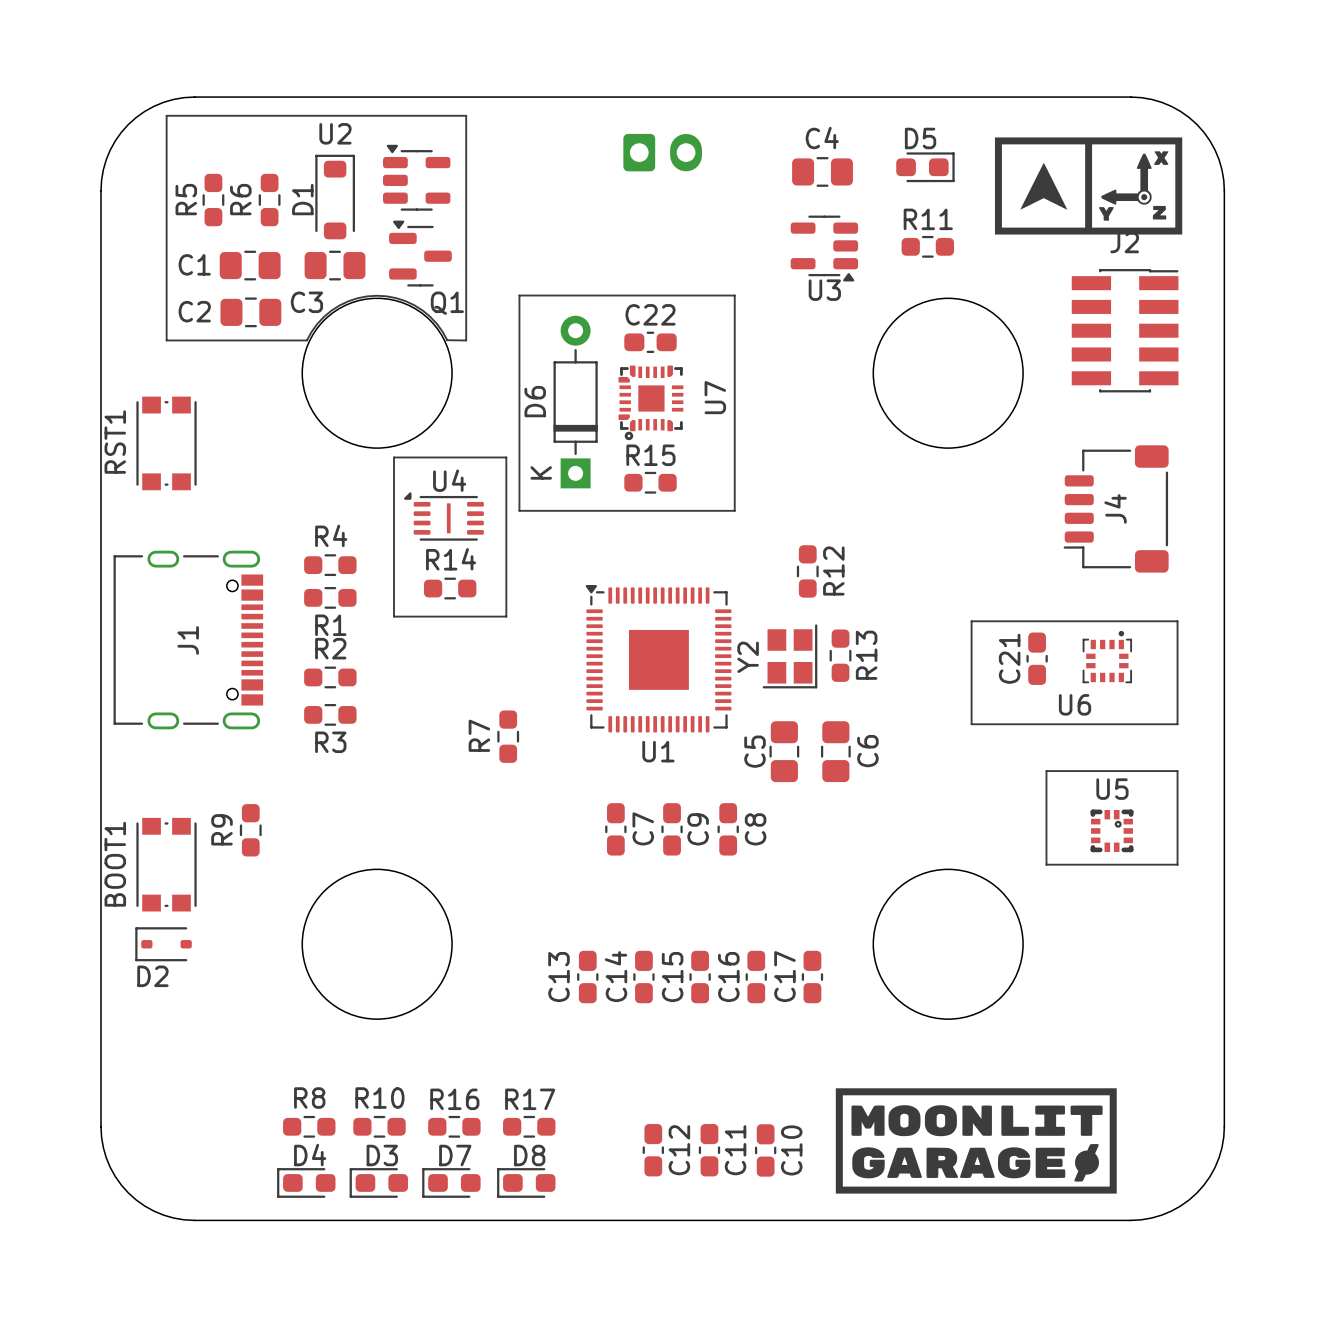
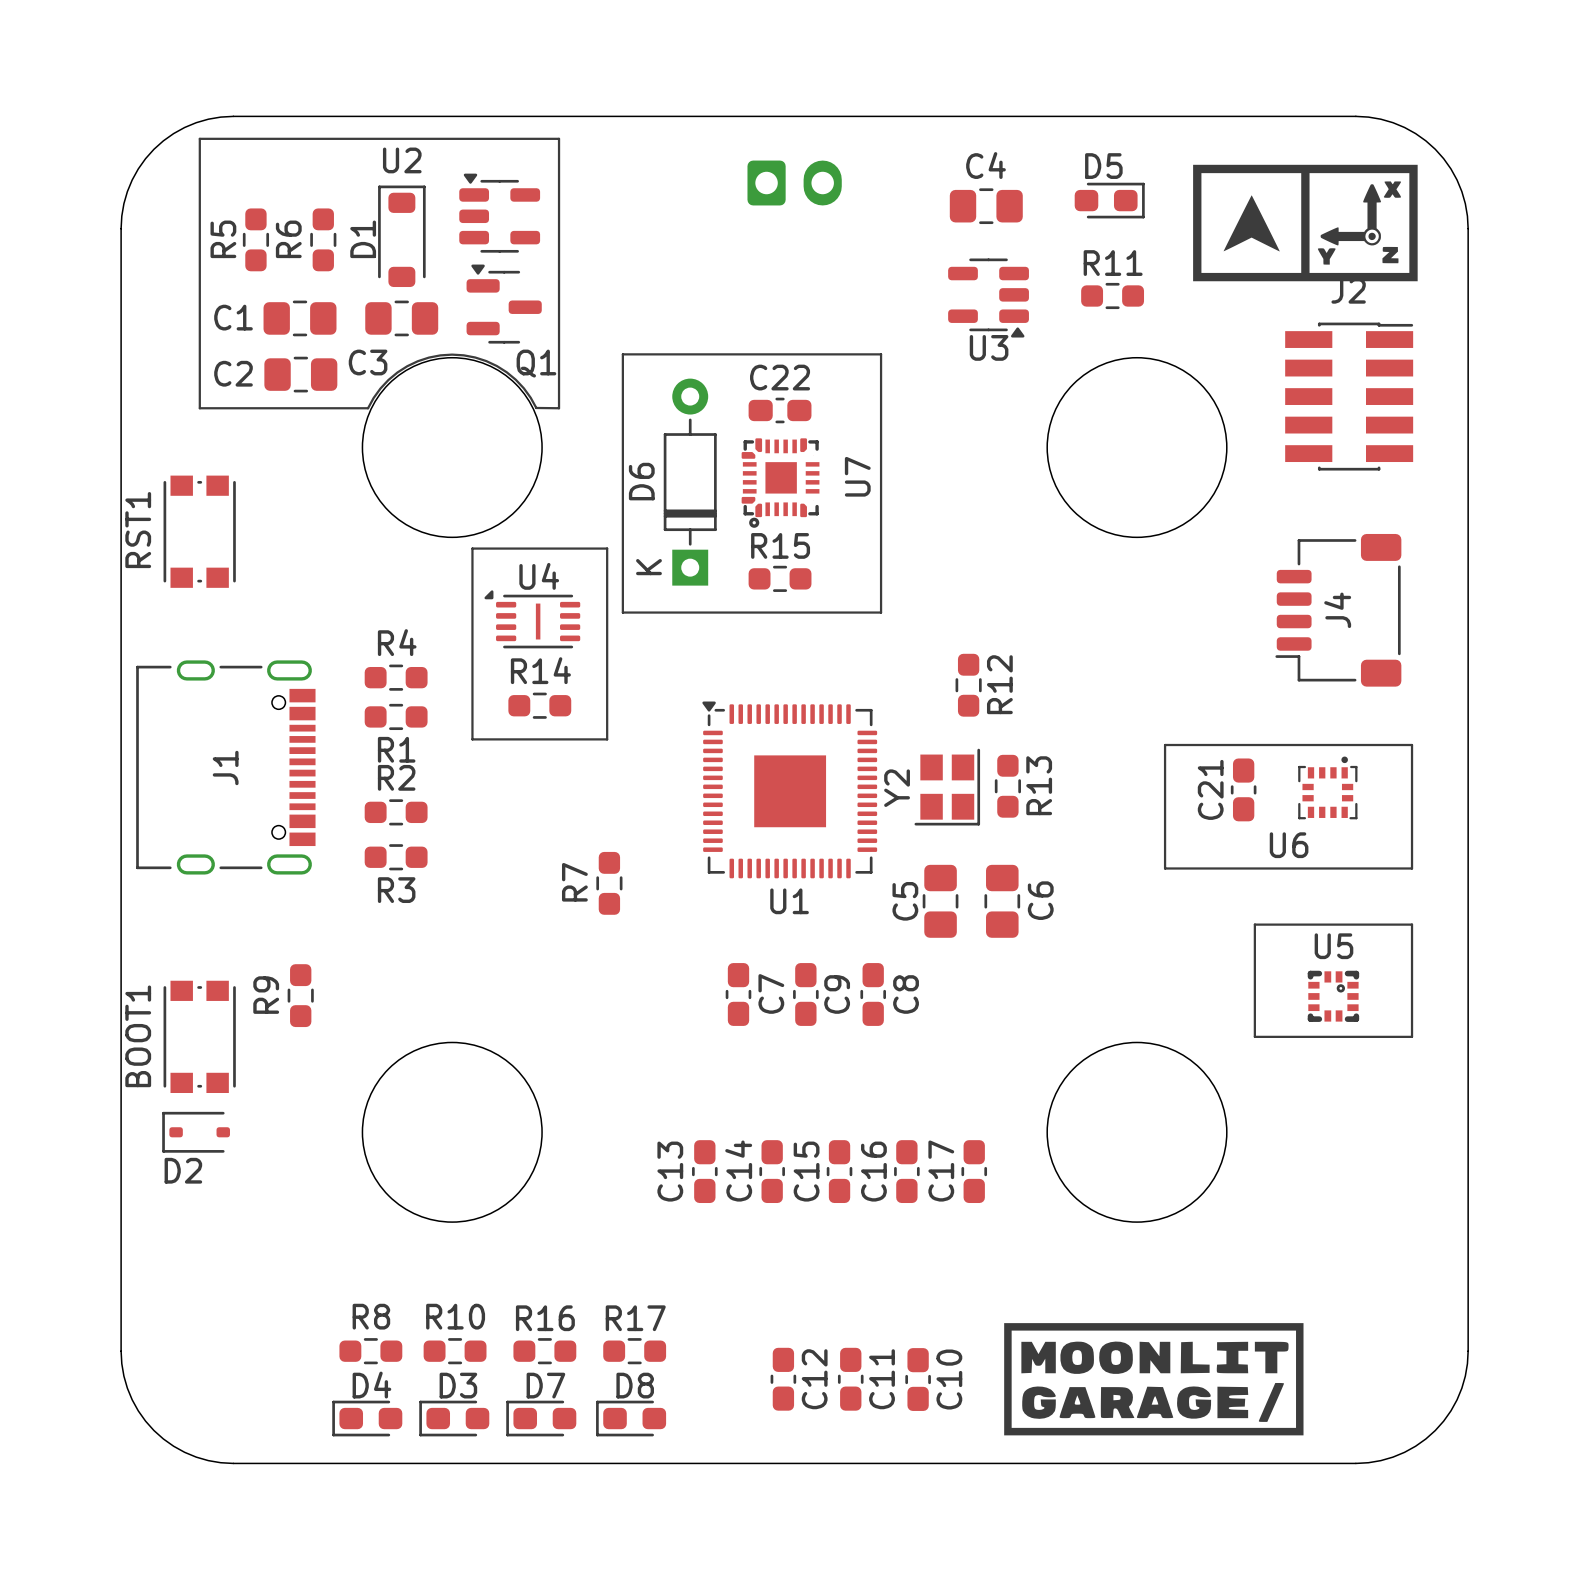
drawing shape: [835, 1088, 1117, 1194] -> [1004, 1323, 1304, 1436]

